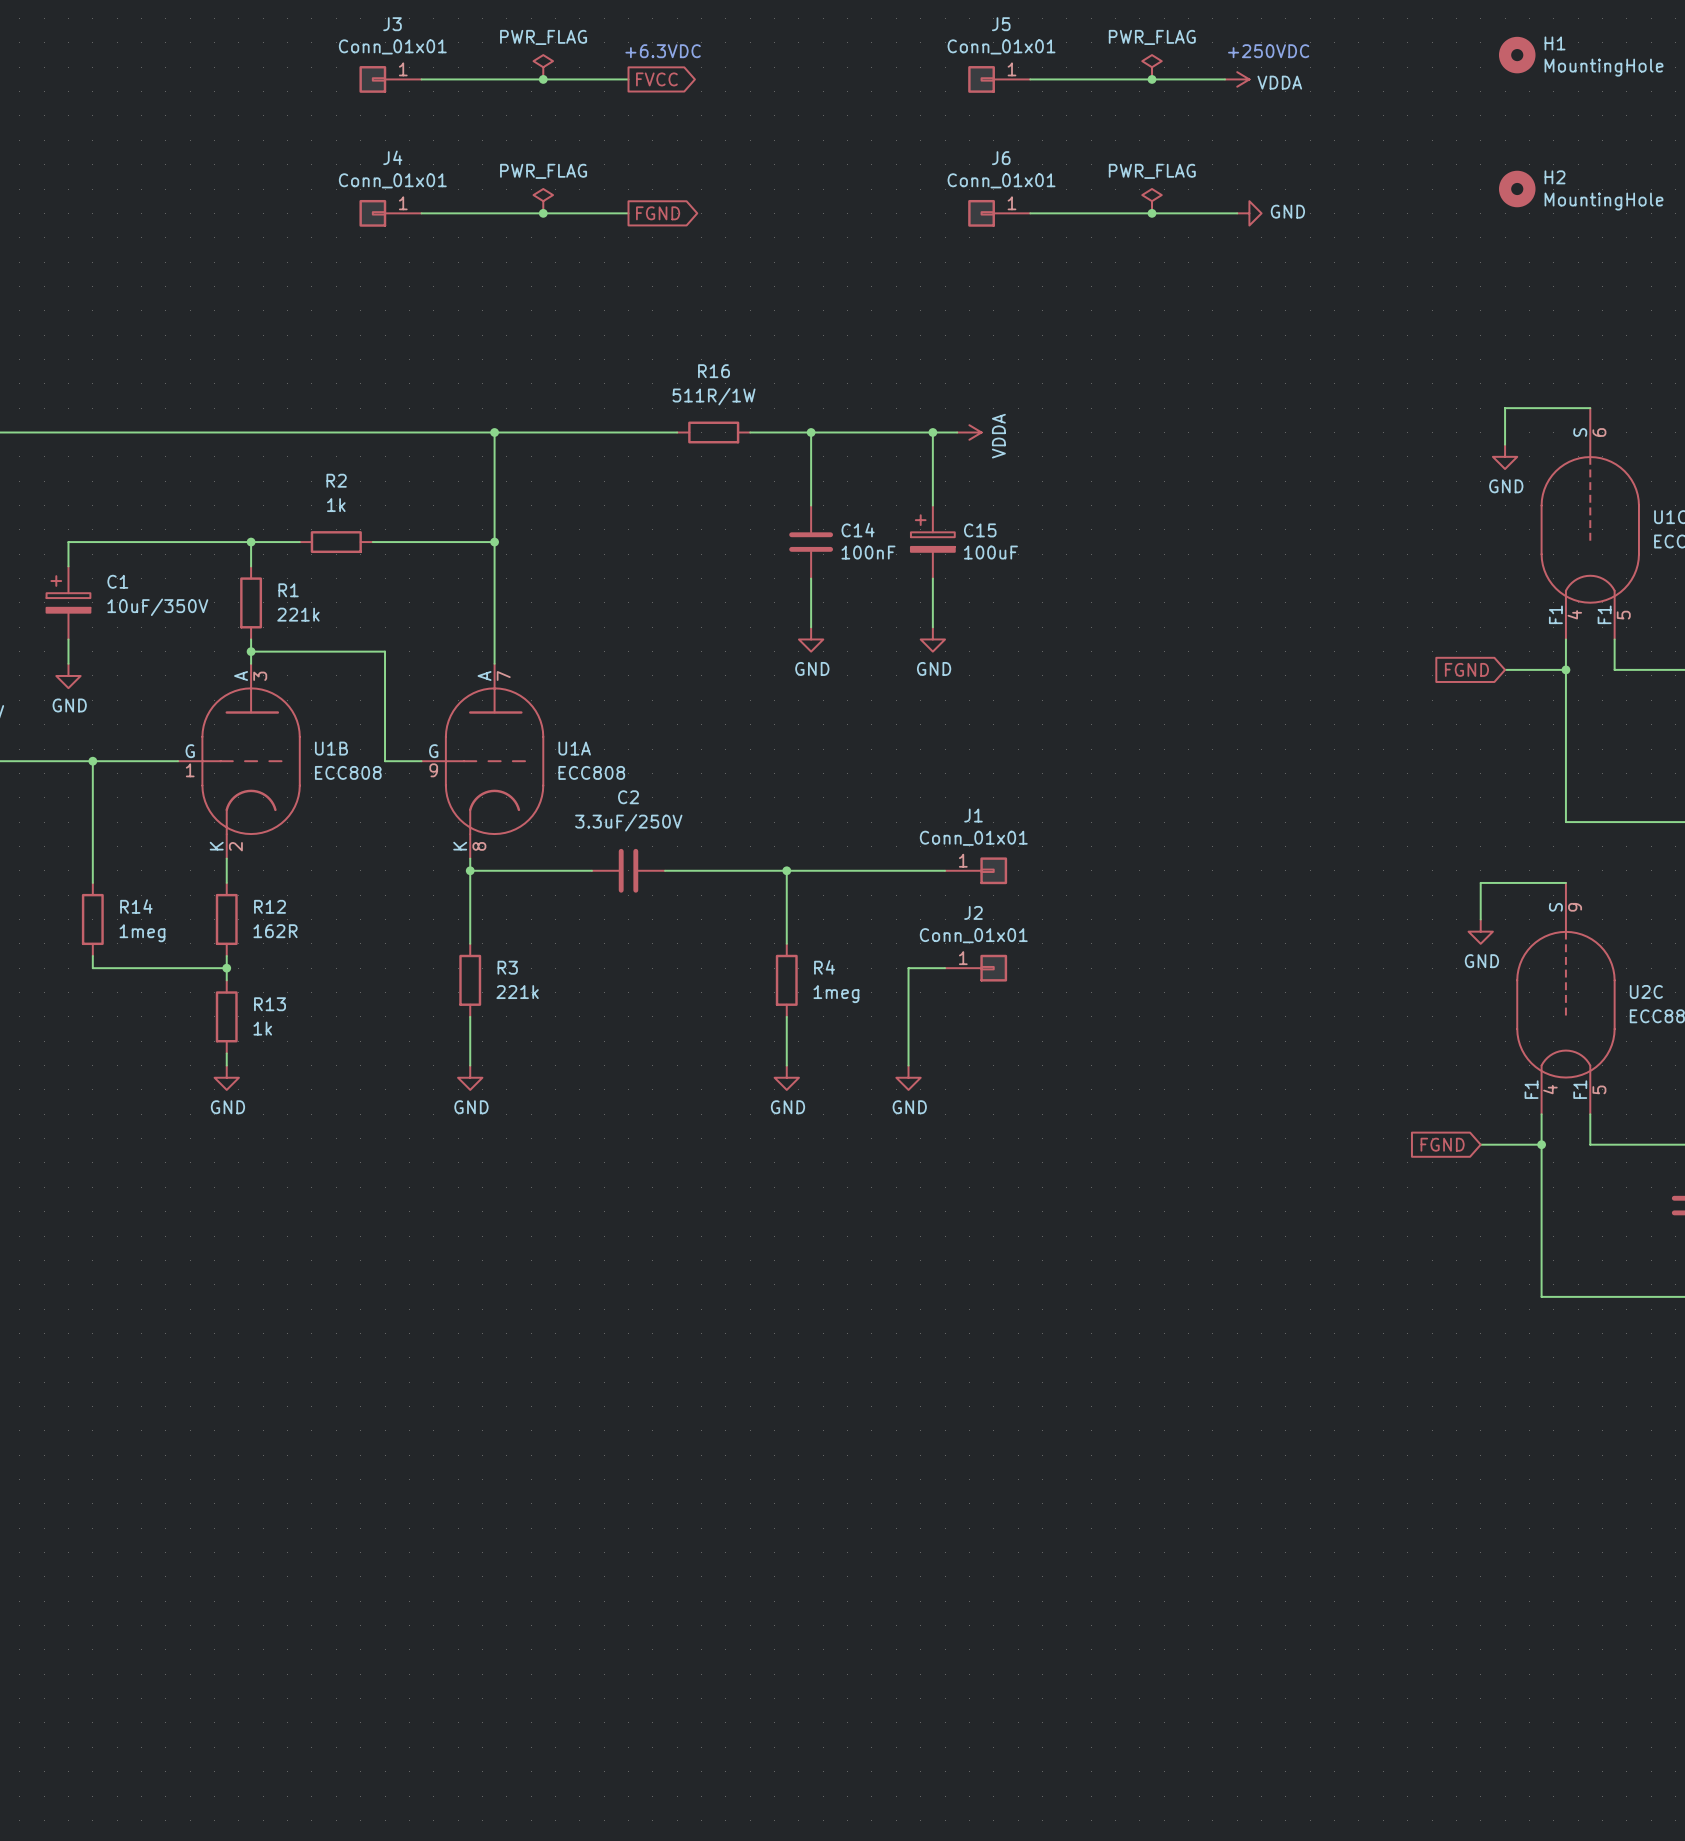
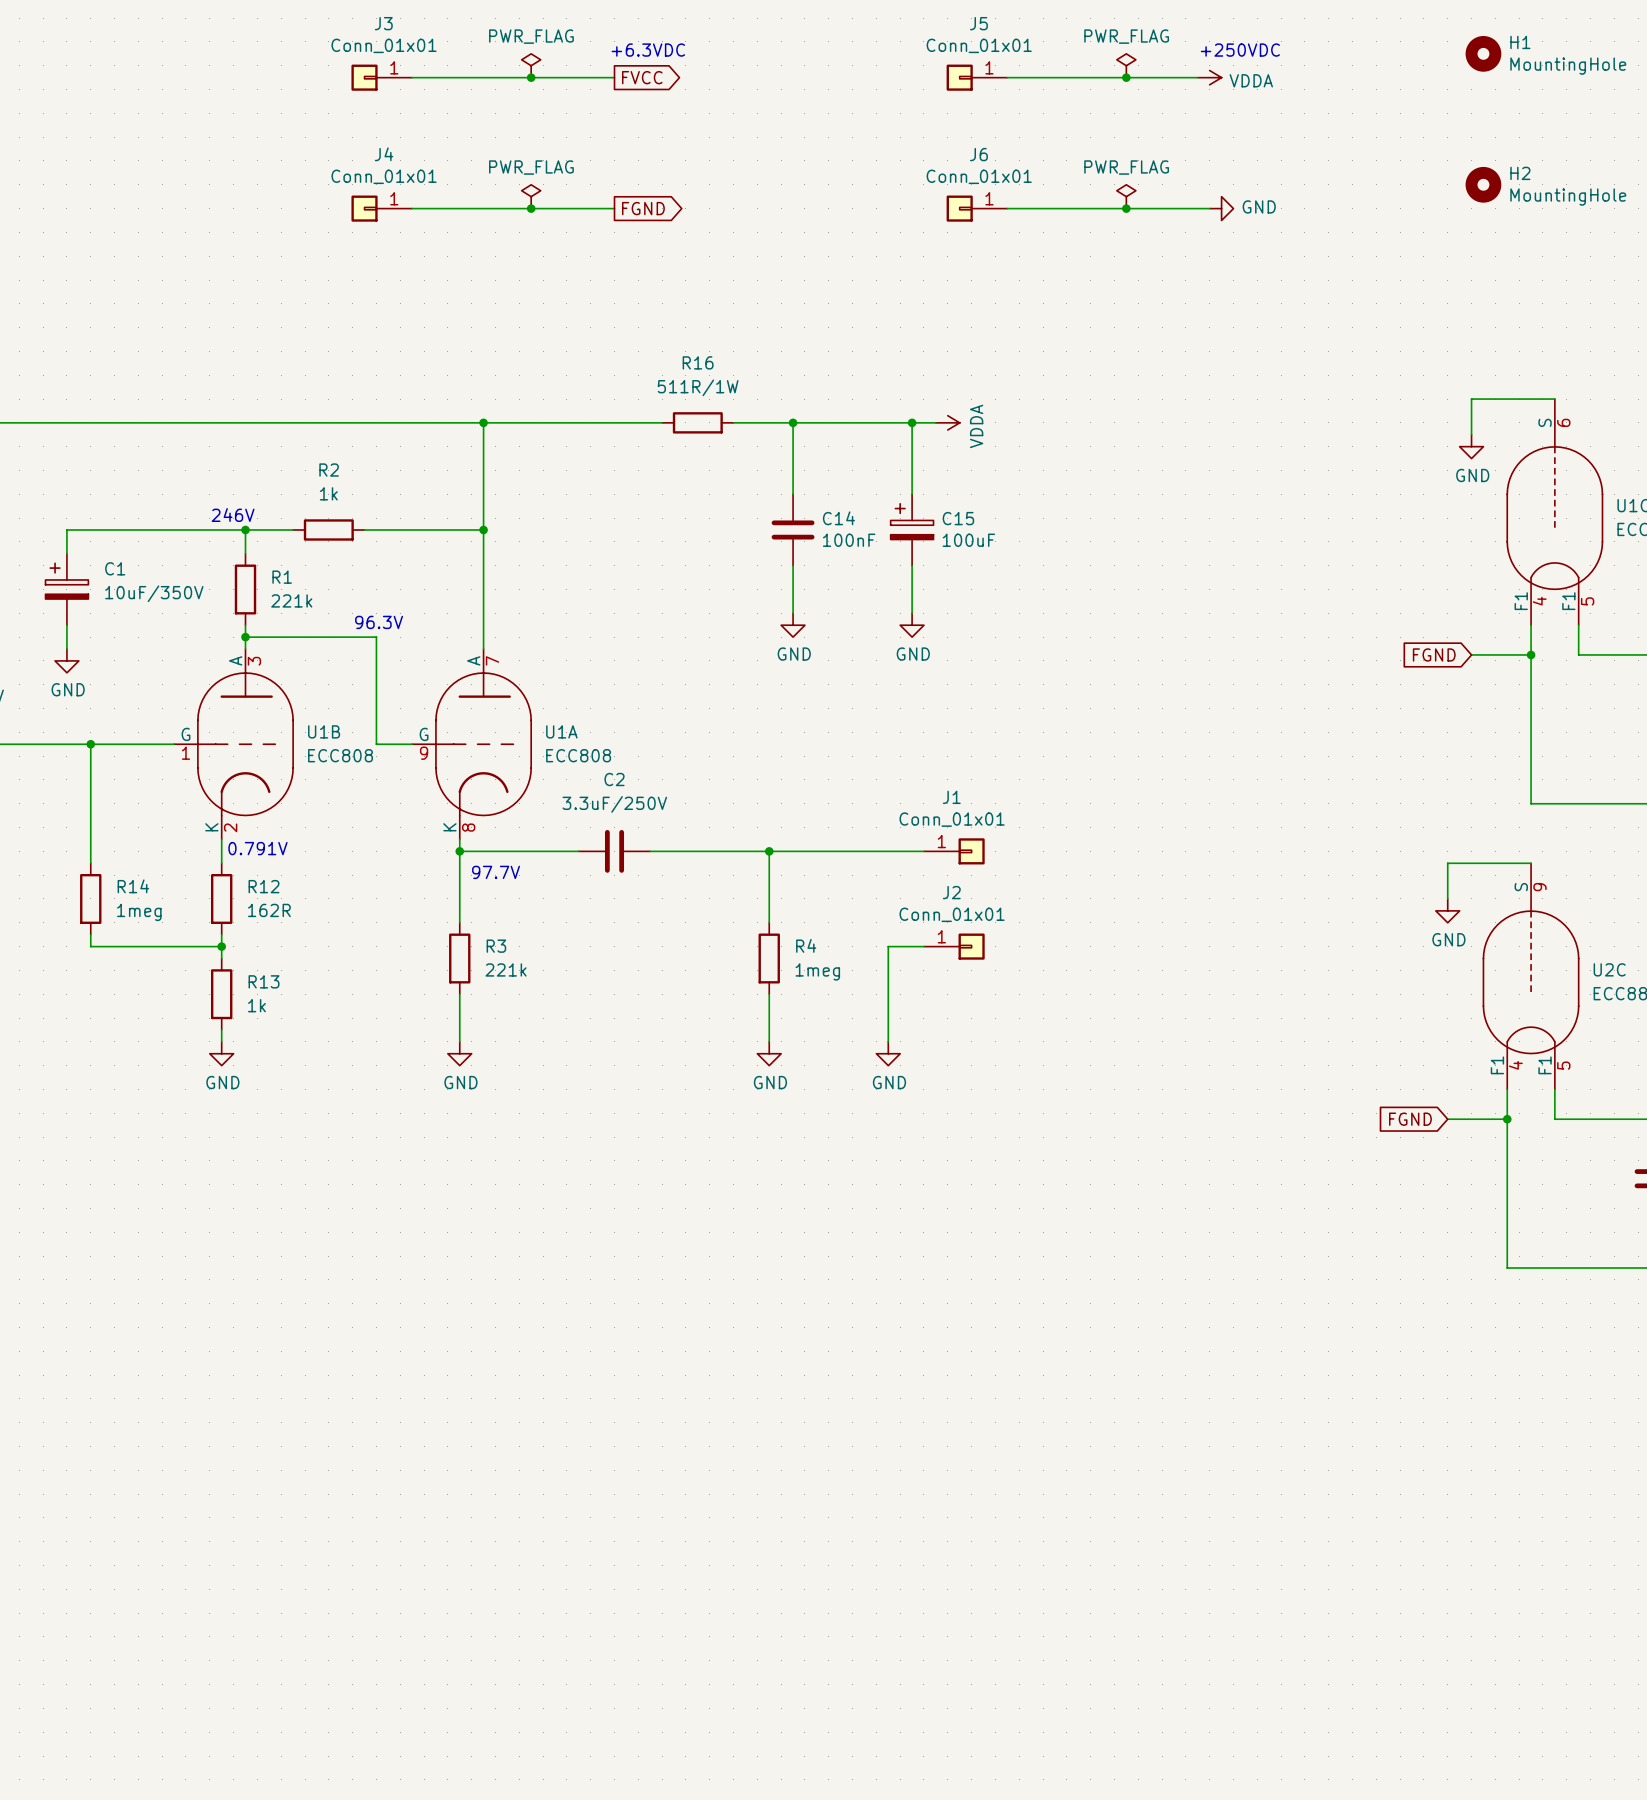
text: none -> 246V (233, 515)
text: none -> 96.3V (379, 622)
text: none -> 0.791V (257, 848)
text: none -> 97.7V (496, 872)

